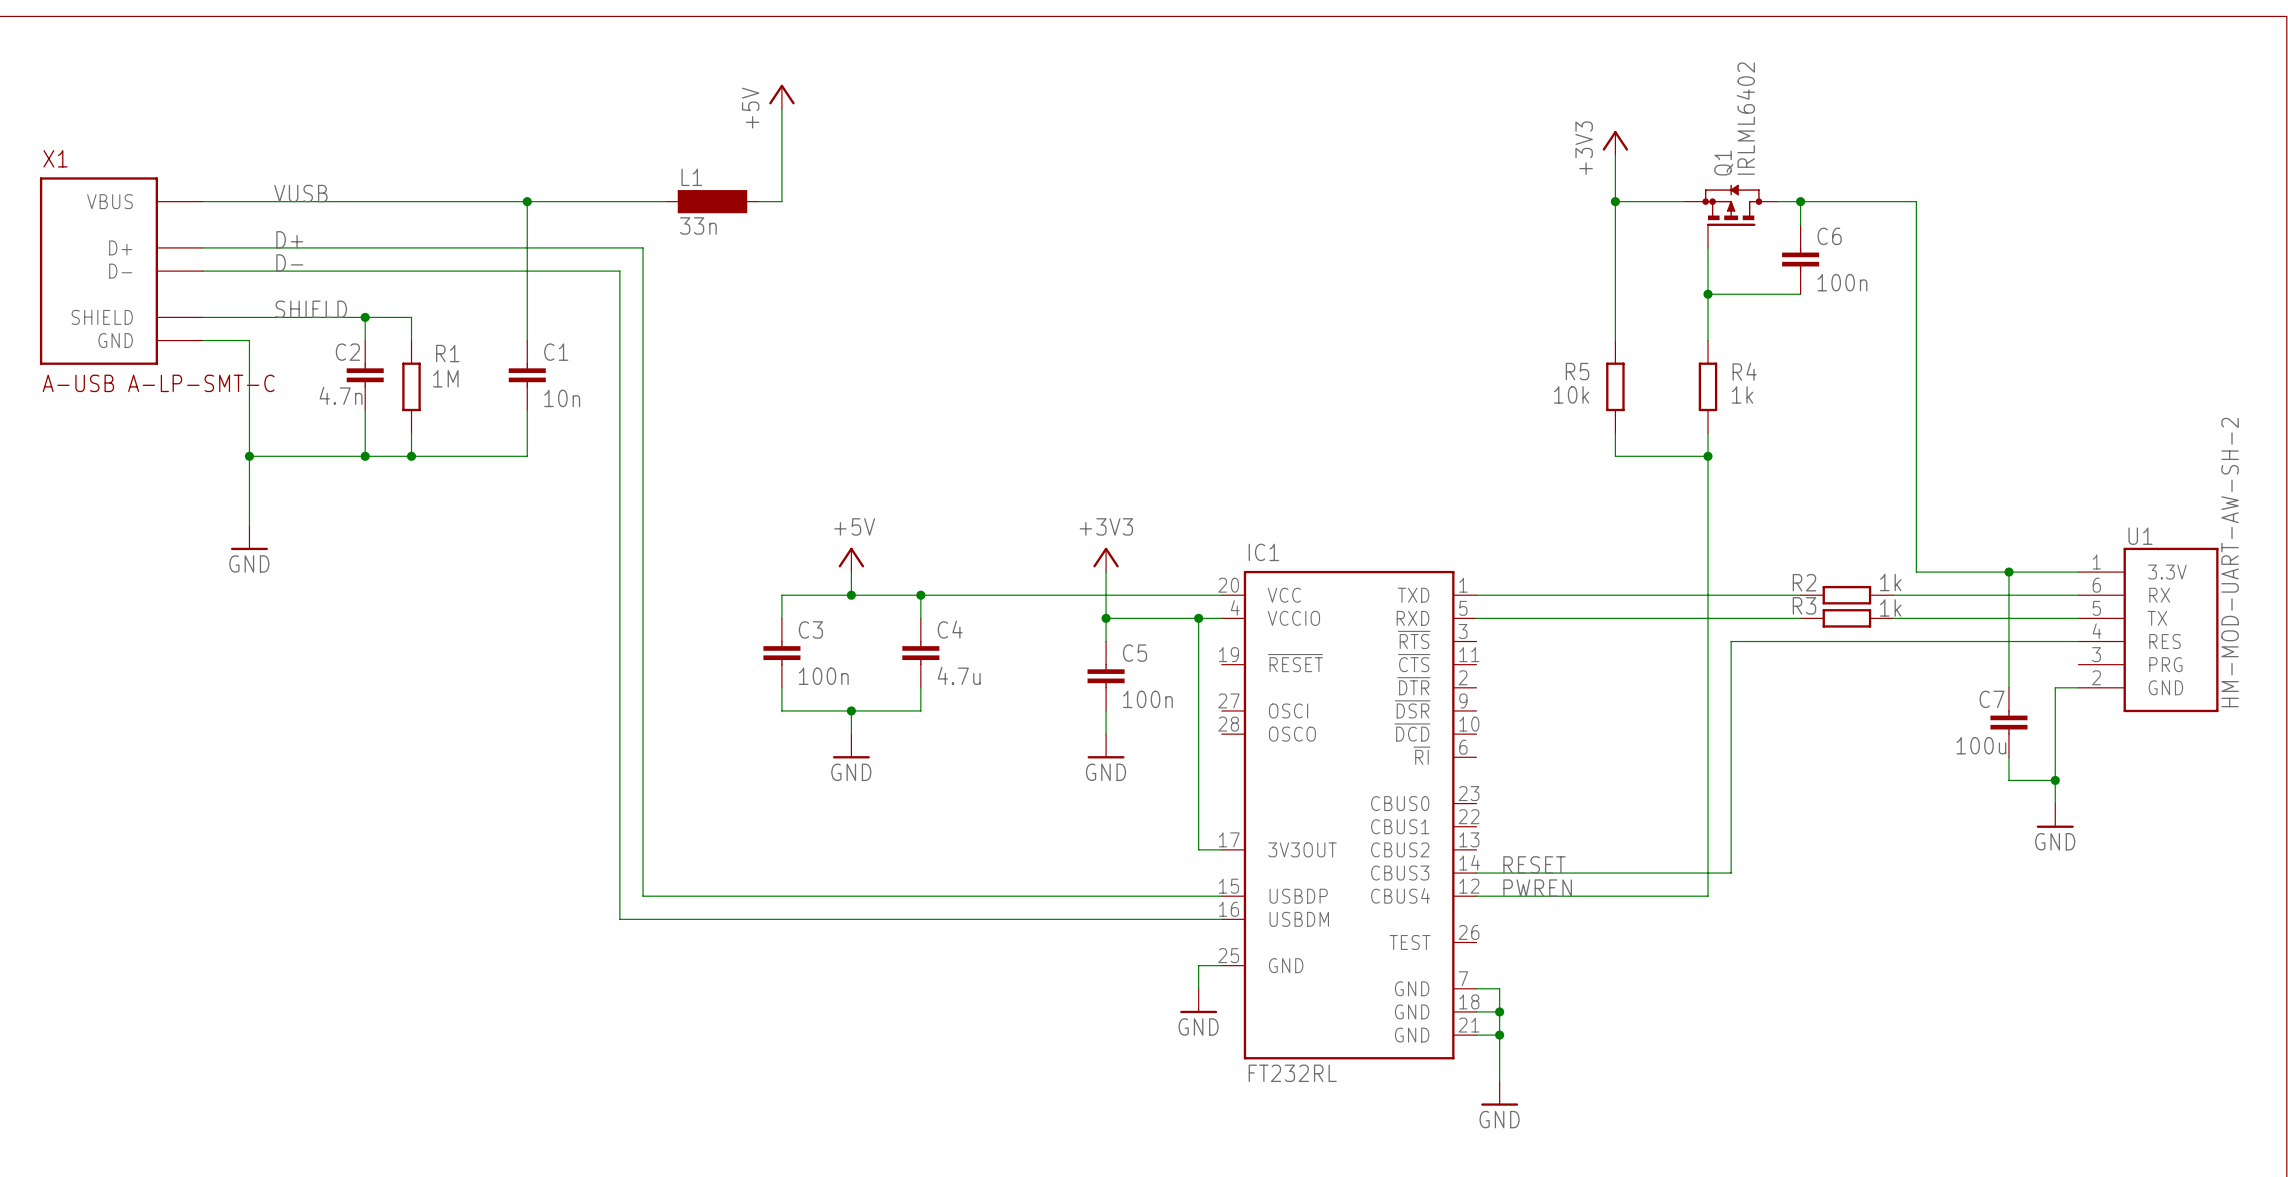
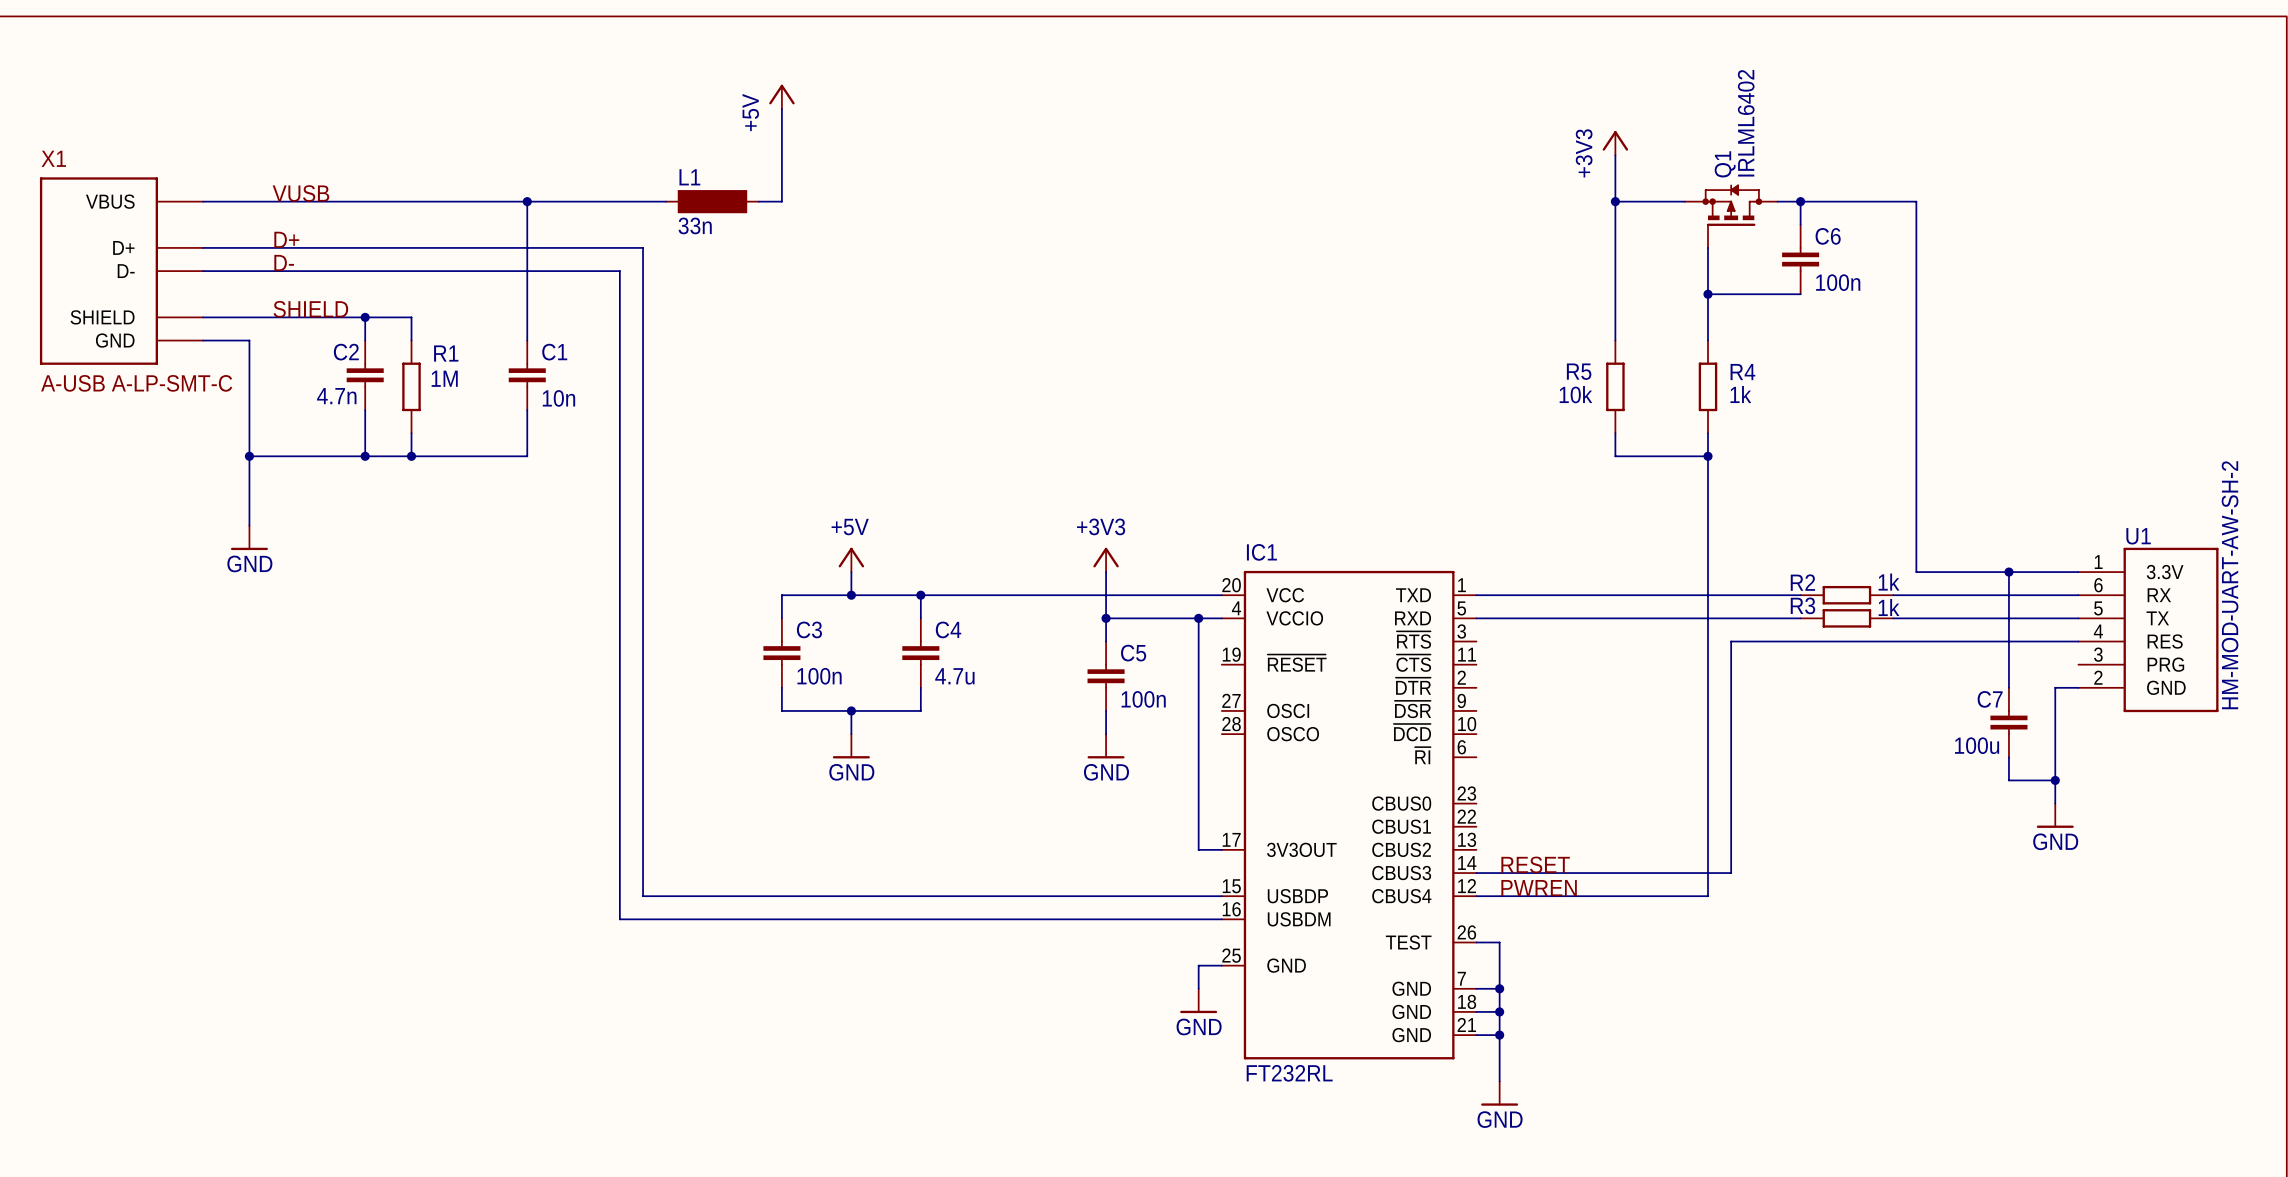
wire: none -> (1476, 942) (1499, 942) (1499, 988)
junction: none -> (1499, 988)

